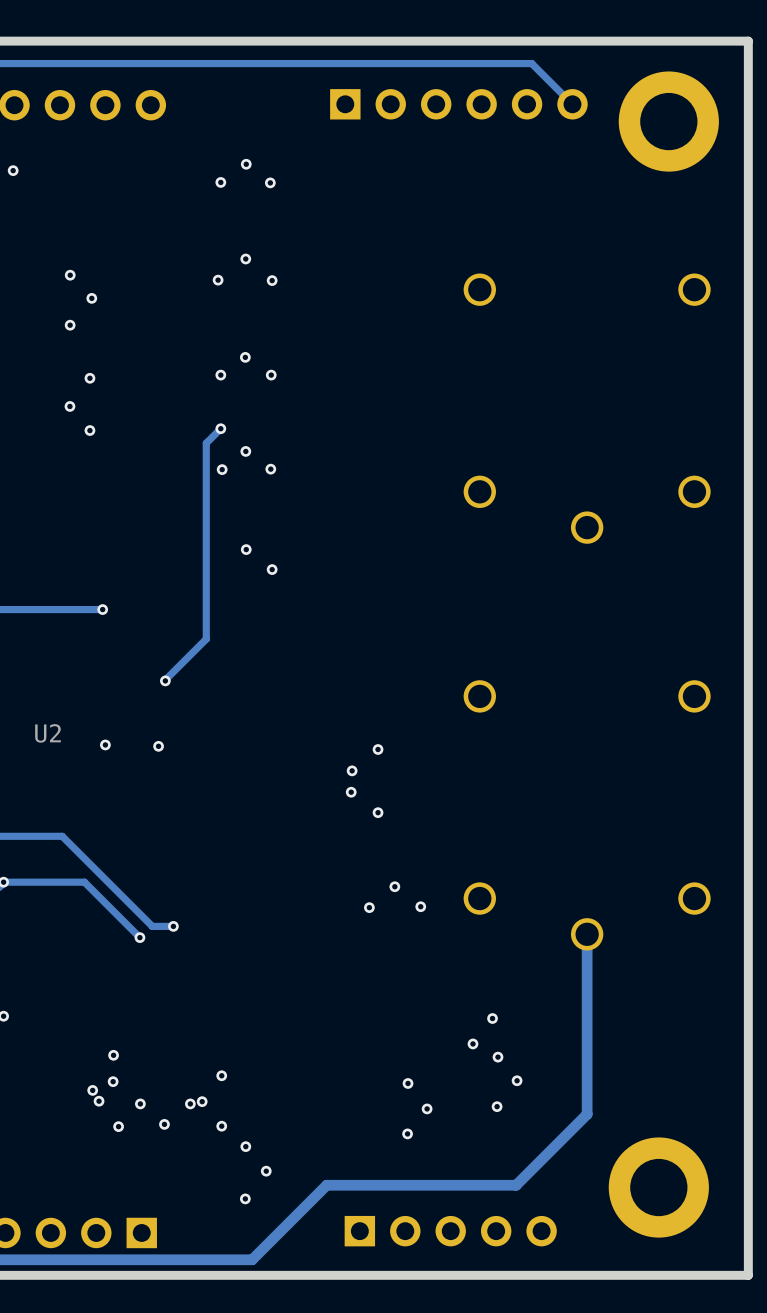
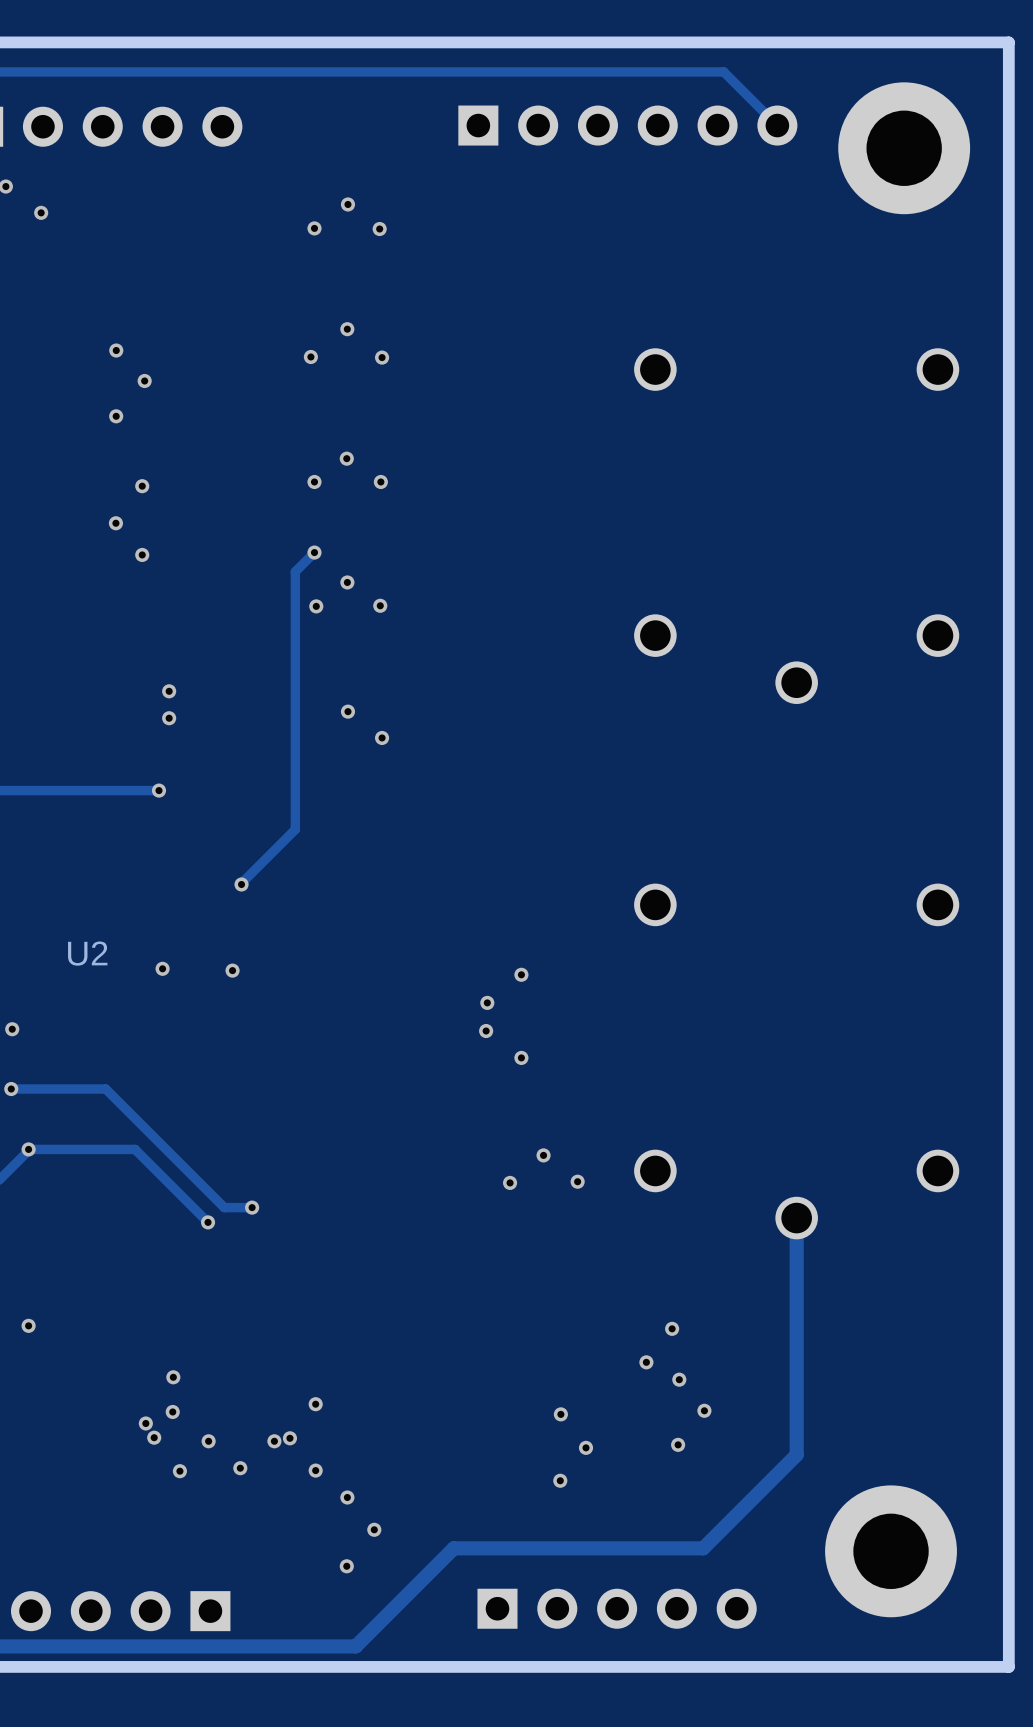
via: none -> (169, 691)
via: none -> (169, 718)

